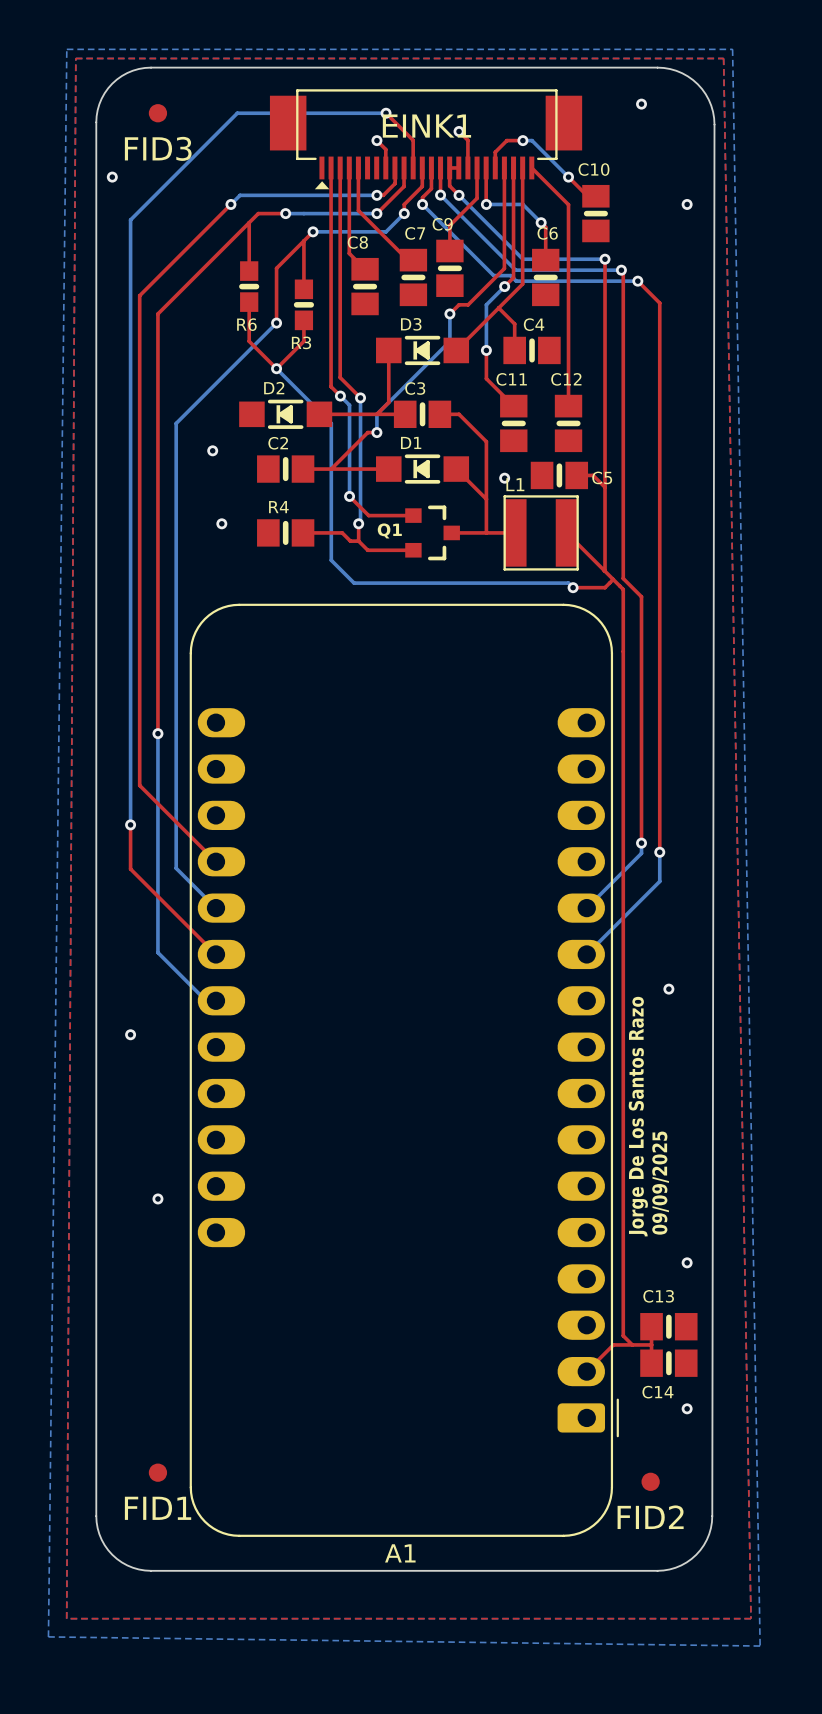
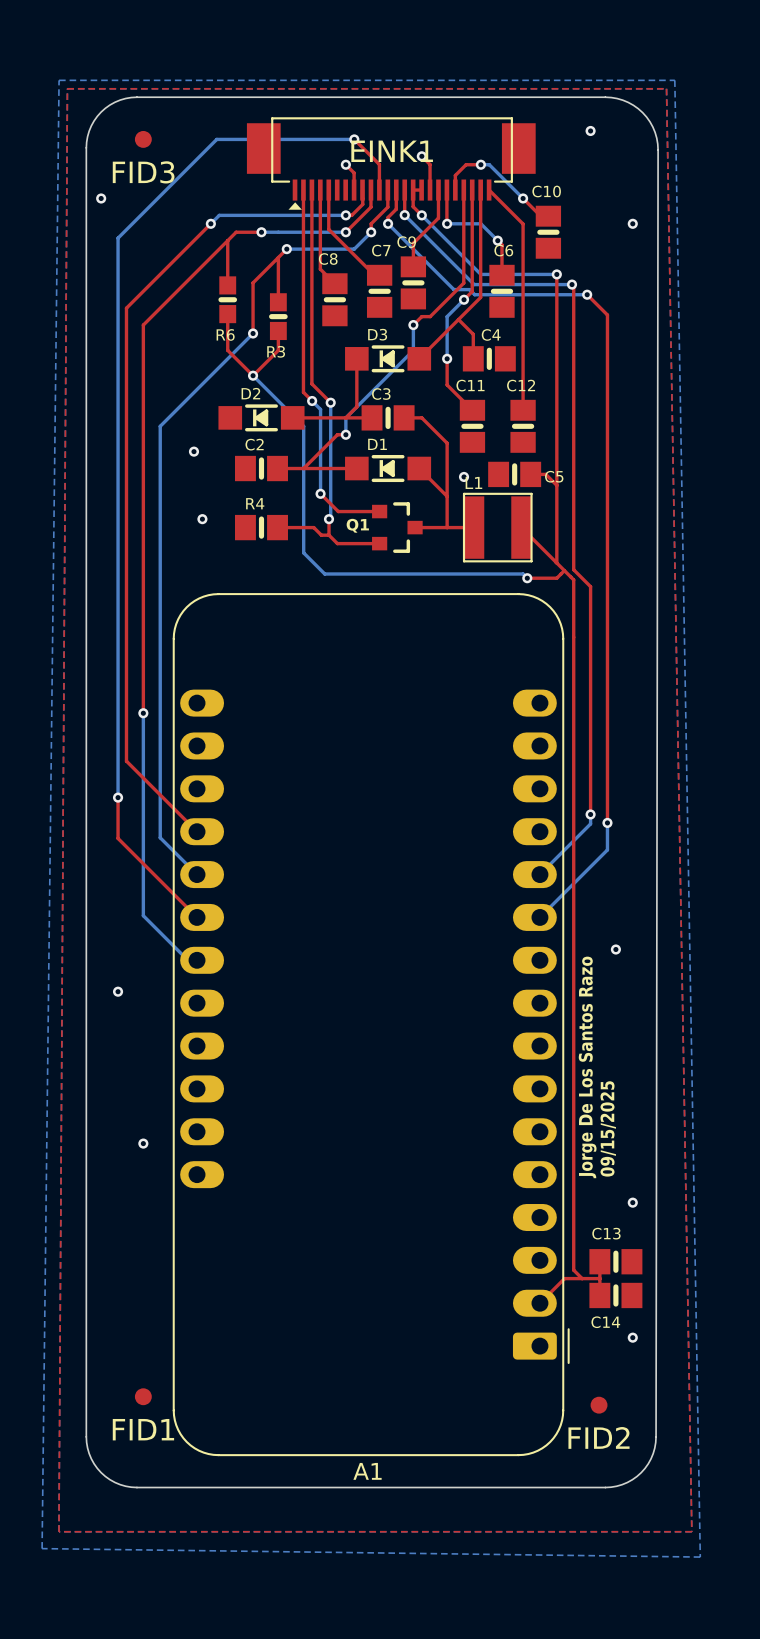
text: 09/09/2025 (660, 1183) -> 09/15/2025 (608, 1128)

